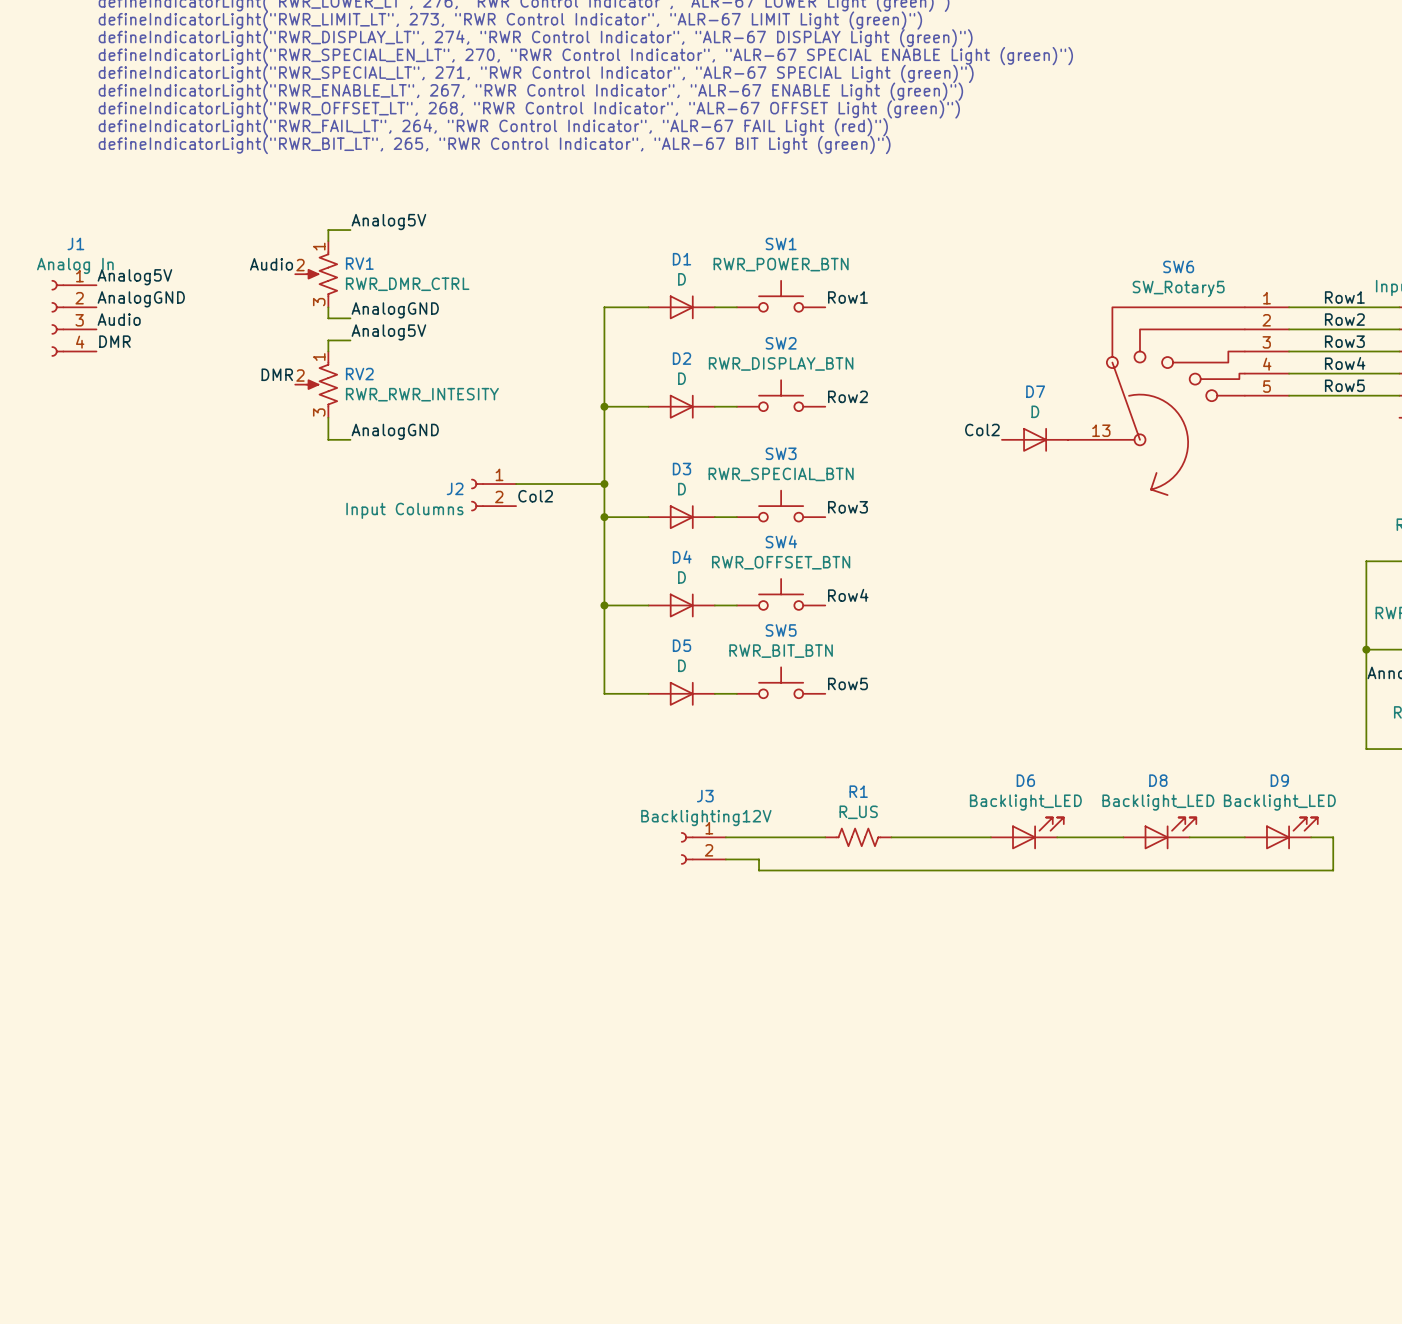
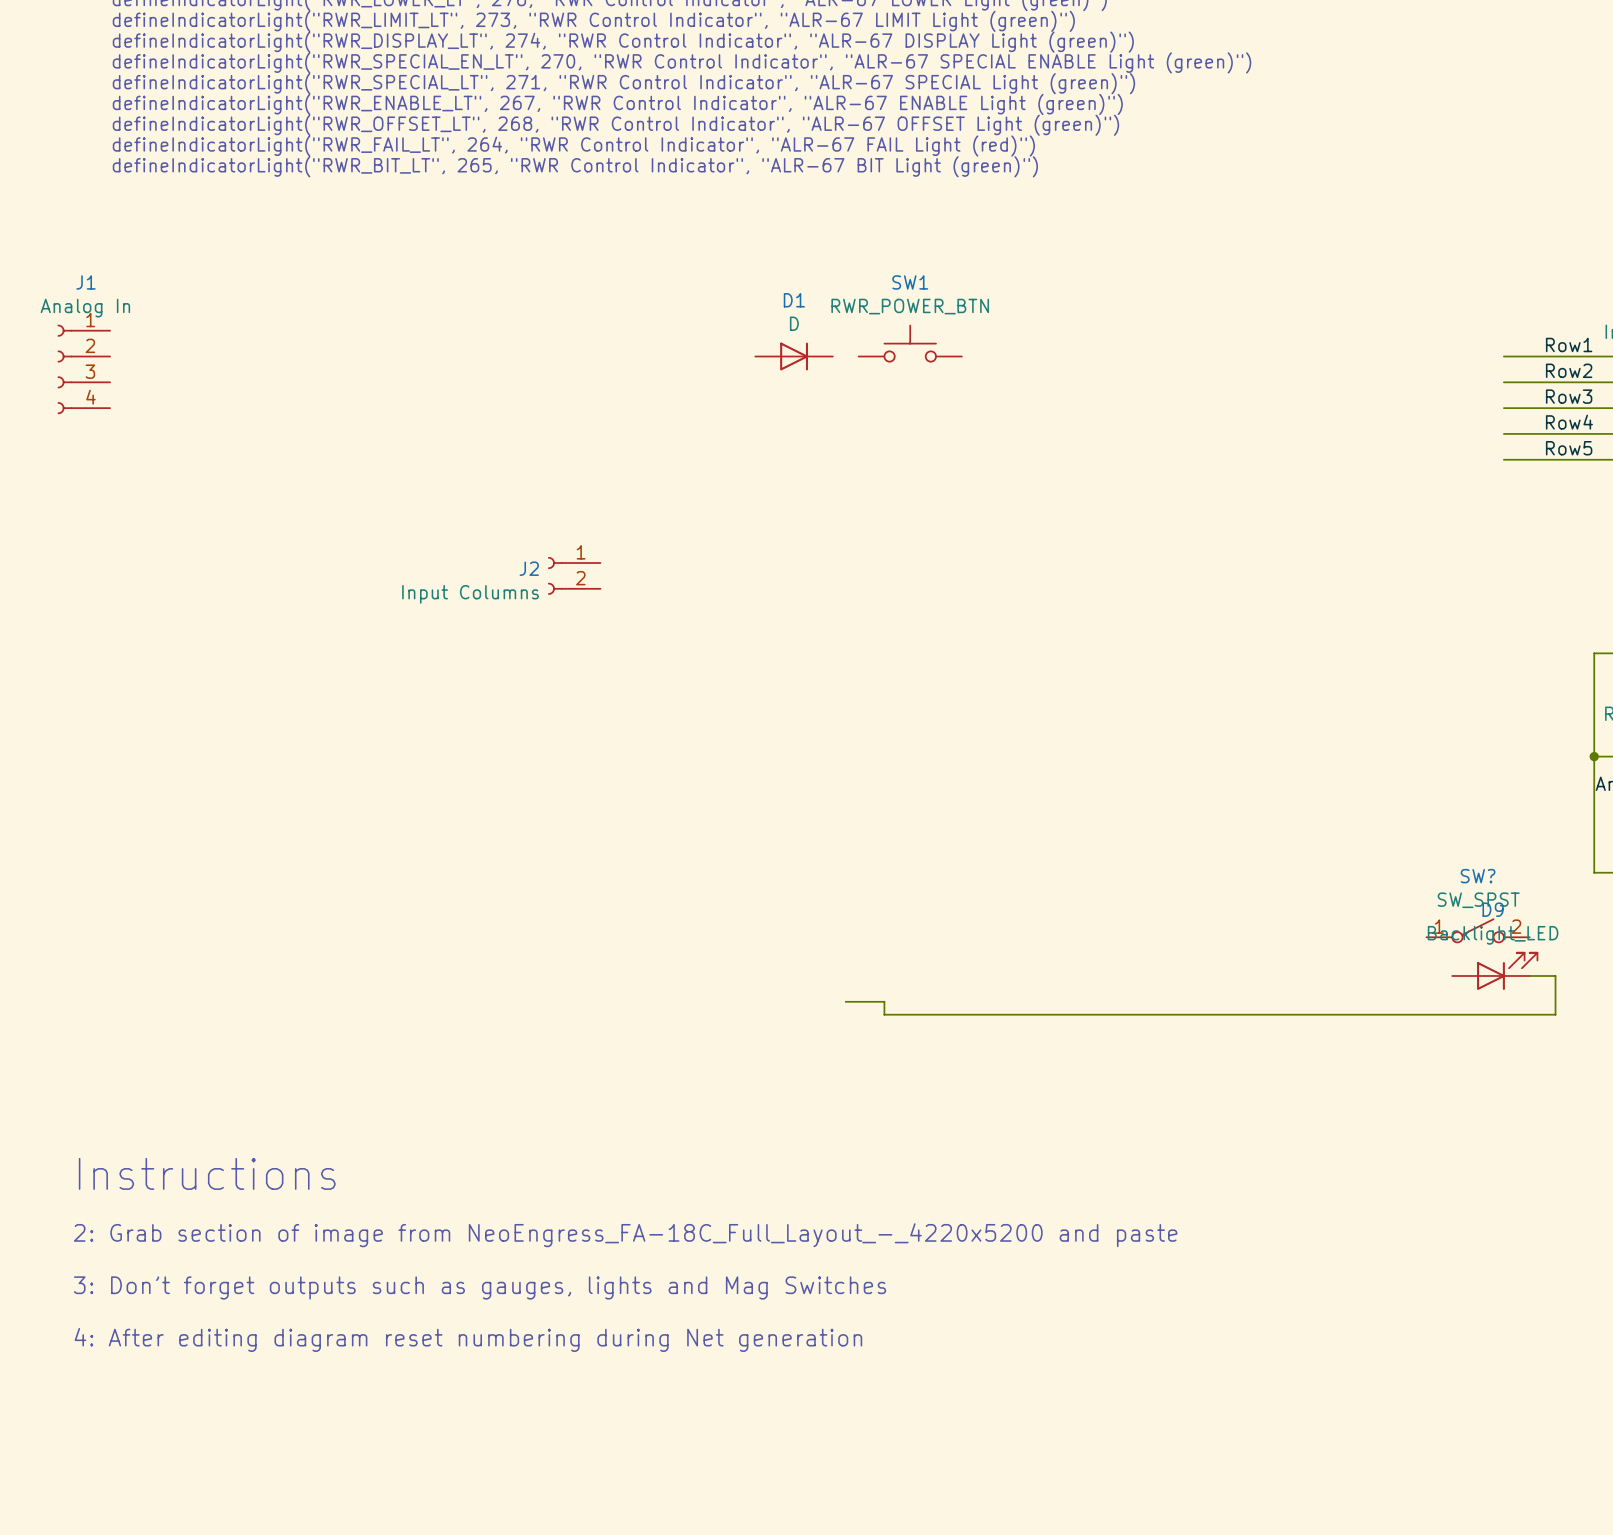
label: Analog5V (388, 222) -> none
wire: (350, 230) (328, 230) (328, 241) -> none
label: Audio (271, 264) -> none
RV1: RWR_DMR_CTRL (316, 274) -> none
label: Analog5V (134, 277) -> none
label: Row1 (847, 297) -> none
label: AnalogGND (141, 299) -> none
wire: (328, 307) (328, 318) (350, 318) -> none
wire: (648, 307) (604, 307) (604, 693) (648, 693) -> none
wire: (714, 307) (736, 307) -> none
label: AnalogGND (395, 310) -> none
label: Audio (119, 319) -> none
label: Analog5V (388, 332) -> none
wire: (350, 340) (328, 340) (328, 351) -> none
label: DMR (114, 341) -> none
label: DMR (277, 374) -> none
RV2: RWR_RWR_INTESITY (316, 384) -> none
SW2: RWR_DISPLAY_BTN (781, 395) -> none
label: Row2 (847, 396) -> none
SW6: SW_Rotary5 (1178, 401) -> none
wire: (604, 406) (648, 406) -> none
junction: (604, 406) -> none
D2: D (681, 406) -> none
wire: (714, 406) (736, 406) -> none
wire: (328, 417) (328, 439) (350, 439) -> none
label: Col2 (982, 429) -> none
label: AnalogGND (395, 431) -> none
D7: D (1035, 439) -> none
wire: (516, 484) (604, 484) -> none
junction: (604, 484) -> none
label: Col2 (535, 496) -> none
SW3: RWR_SPECIAL_BTN (781, 506) -> none
label: Row3 (847, 507) -> none
wire: (604, 517) (648, 517) -> none
junction: (604, 517) -> none
D3: D (681, 517) -> none
wire: (714, 517) (736, 517) -> none
SW4: RWR_OFFSET_BTN (781, 594) -> none
label: Row4 (848, 595) -> none
wire: (604, 605) (648, 605) -> none
junction: (604, 605) -> none
D4: D (681, 605) -> none
wire: (714, 605) (736, 605) -> none
SW5: RWR_BIT_BTN (781, 682) -> none
label: Row5 (847, 683) -> none
D5: D (681, 693) -> none
wire: (714, 693) (736, 693) -> none
SW?: none -> SW_SPST (1478, 930)
D6: Backlight_LED (1027, 833) -> none
D8: Backlight_LED (1159, 833) -> none
wire: (725, 837) (825, 837) -> none
R1: R_US (858, 837) -> none
wire: (891, 837) (990, 837) -> none
wire: (1057, 837) (1123, 837) -> none
wire: (1189, 837) (1244, 837) -> none
J3: Backlighting12V (703, 848) -> none
text: none -> Instructions (207, 1173)
text: none -> 2: Grab section of image from NeoEngress_FA-18C_Full_Layout_-_4220x5200 and paste (625, 1235)
text: none -> 3: Don’t forget outputs such as gauges, lights and Mag Switches (480, 1287)
text: none -> 4: After editing diagram reset numbering during Net generation (468, 1339)

